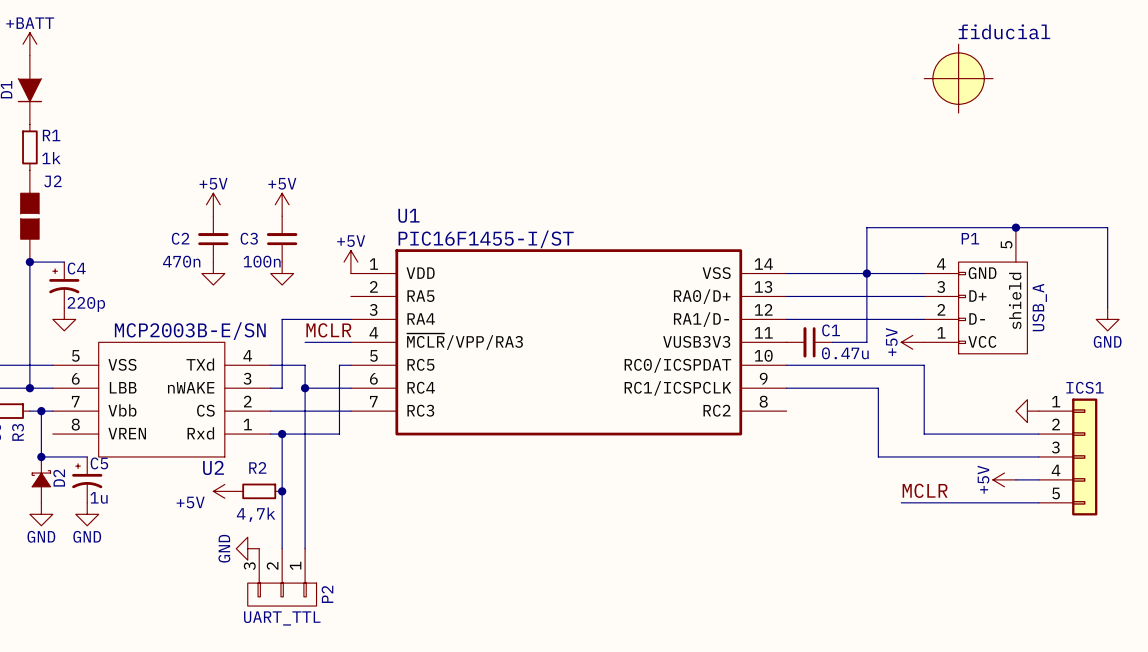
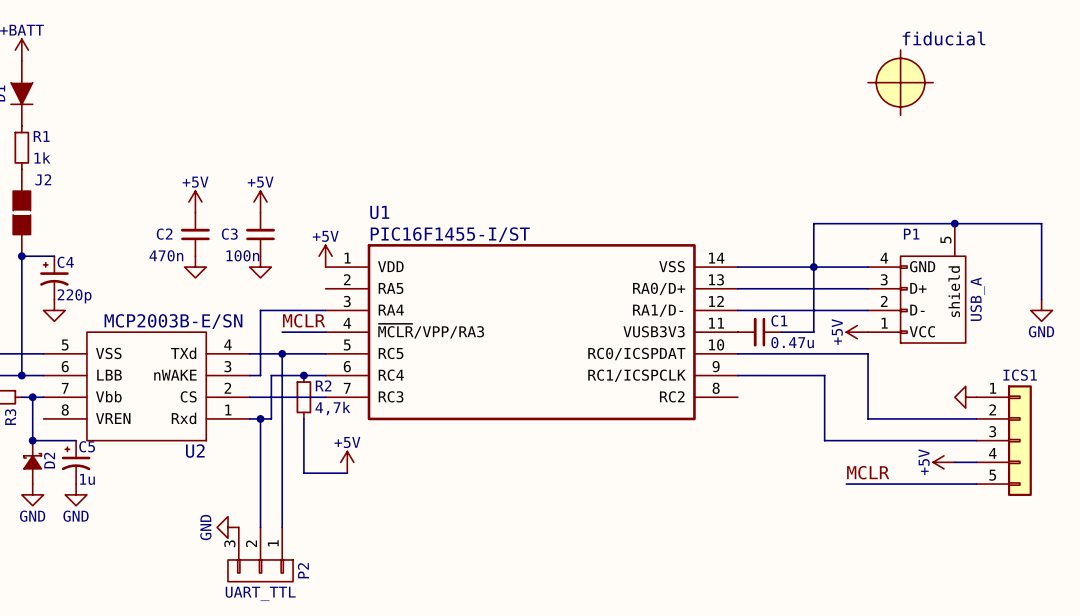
wire: none -> (282, 353) (314, 353)
junction: none -> (282, 353)
wire: (339, 365) (339, 434) (293, 434) -> (282, 375) (271, 375) (271, 418)
junction: (305, 388) -> none
junction: none -> (303, 375)
wire: none -> (303, 418) (303, 473) (347, 473)
power symbol rotation: 0° (224, 491) -> 90° clockwise (347, 462)
power symbol position: +5V (224, 491) -> +5V (347, 462)
R2 rotation: 0° (259, 491) -> 90° clockwise (303, 397)
R2 position: (259, 491) -> (303, 397)
junction: (282, 491) -> none
power symbol text position: +5V (190, 502) -> +5V (347, 442)
R2 value position: 4,7k (256, 514) -> 4,7k (332, 408)

